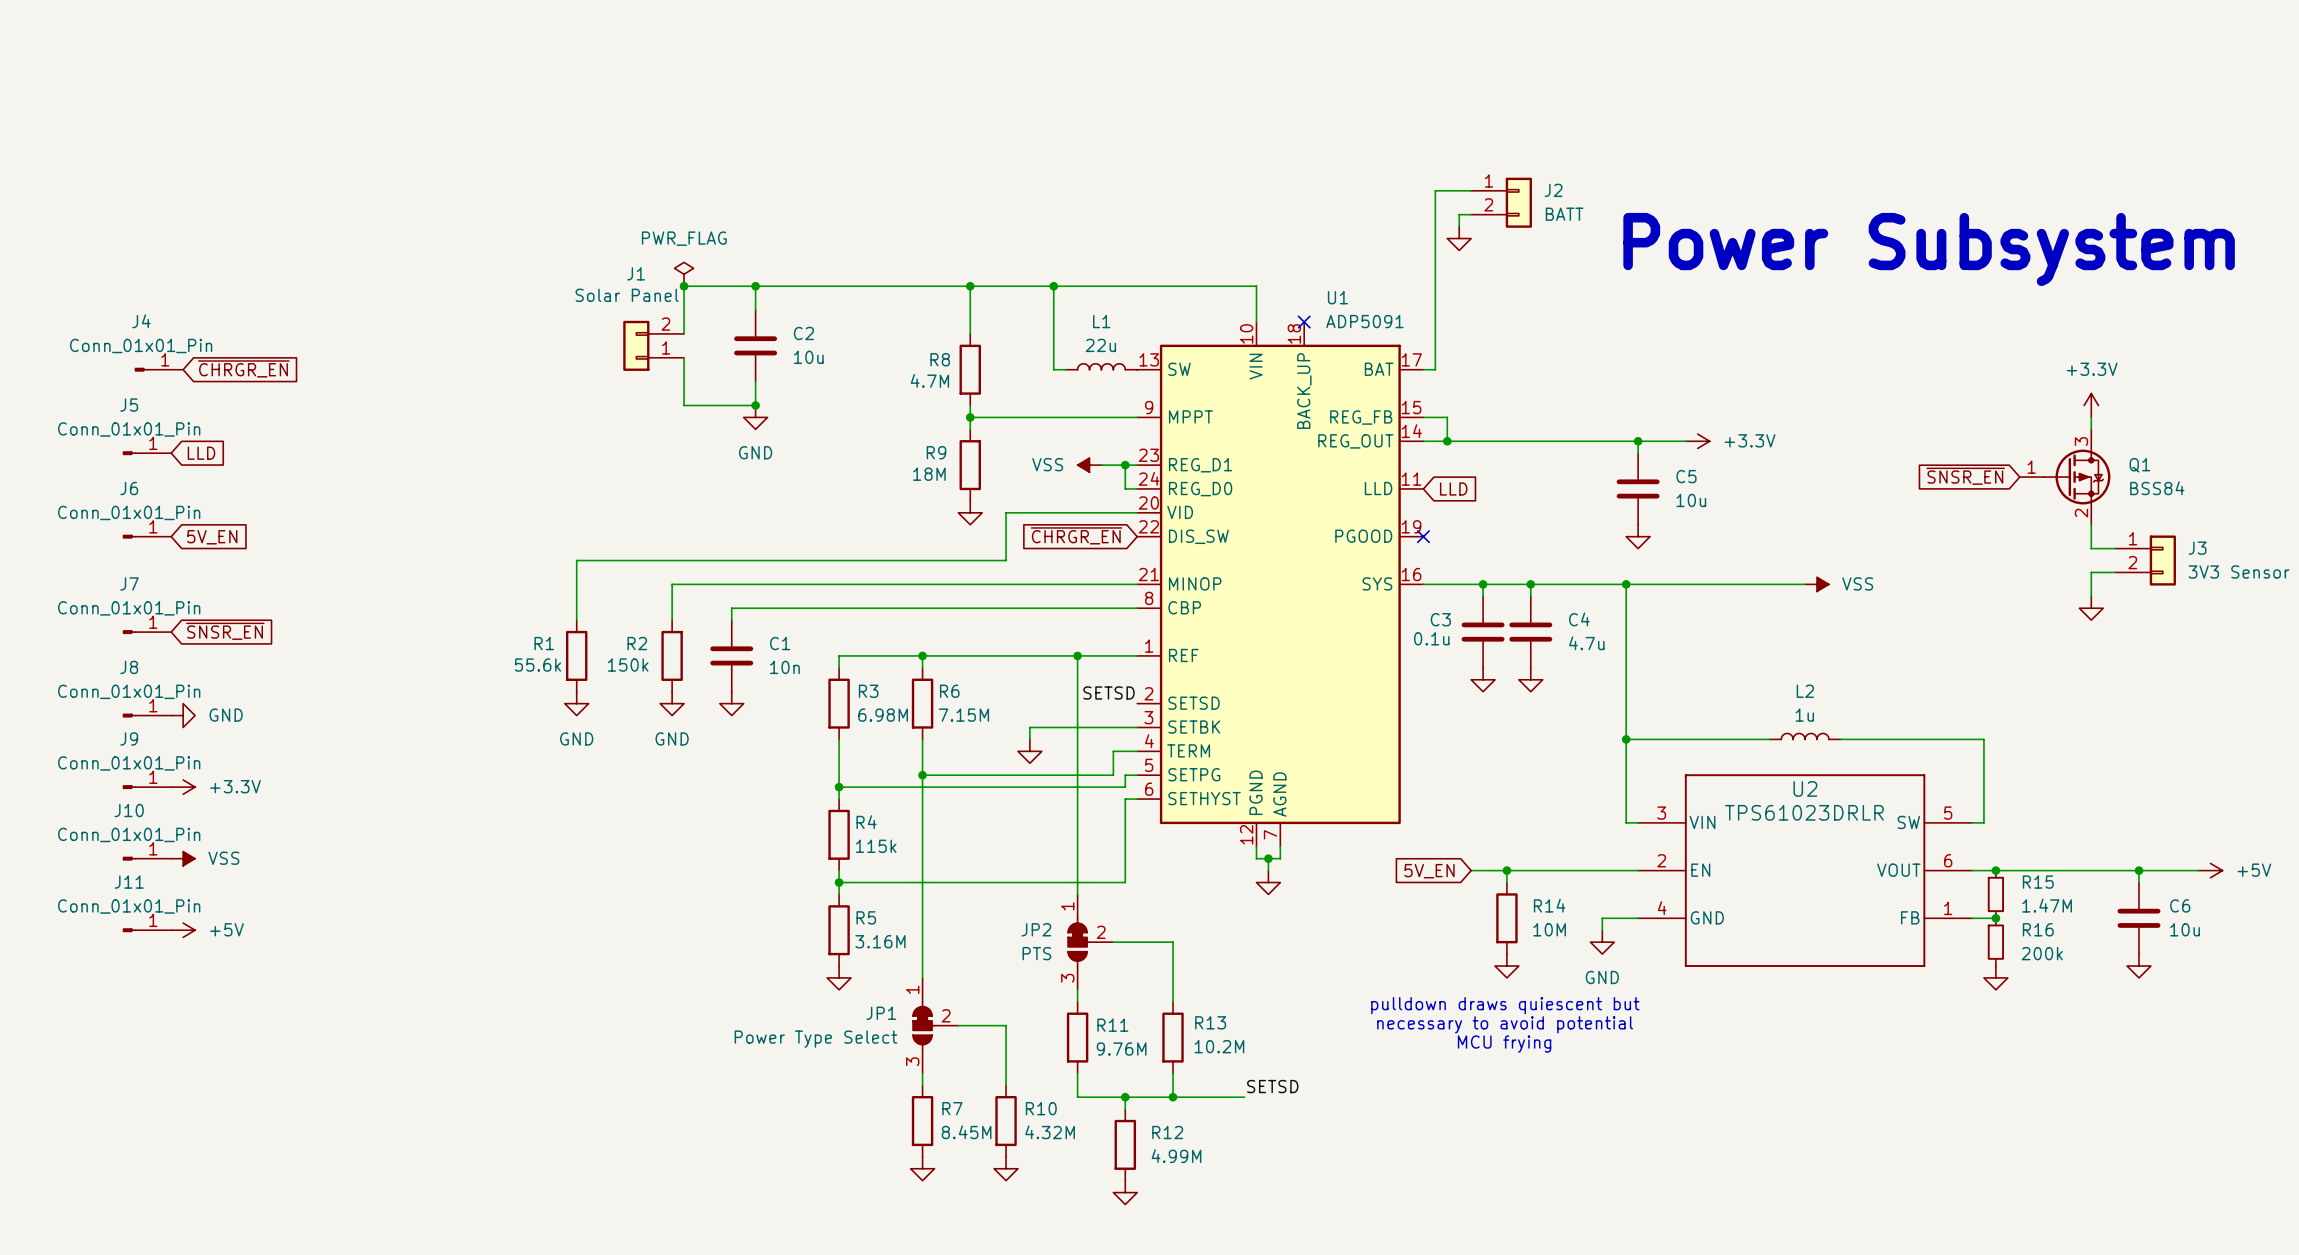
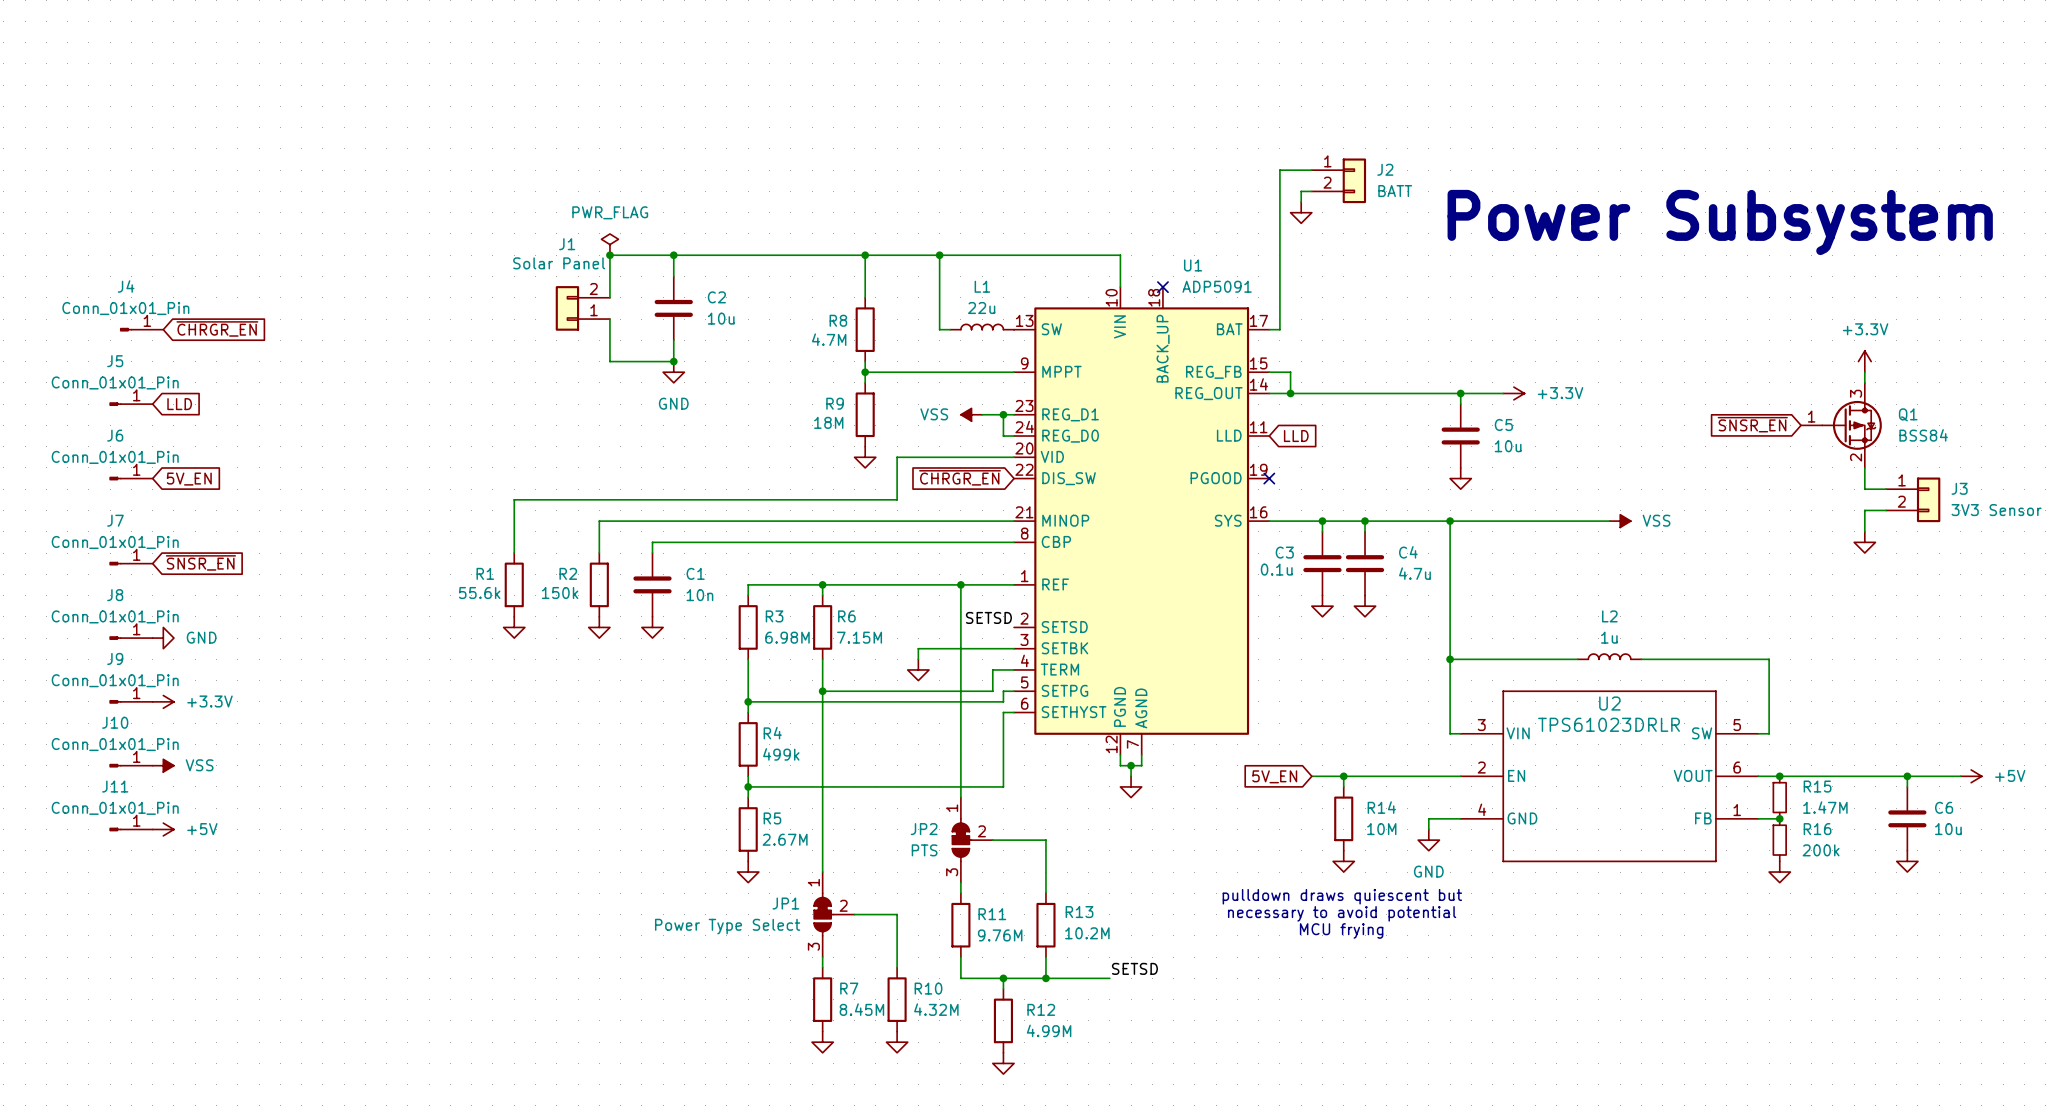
power symbol text: GND (576, 738) -> none
power symbol text: GND (672, 738) -> none
R4 value: 115k (876, 846) -> 499k (781, 754)
R5 value: 3.16M (880, 941) -> 2.67M (785, 839)

